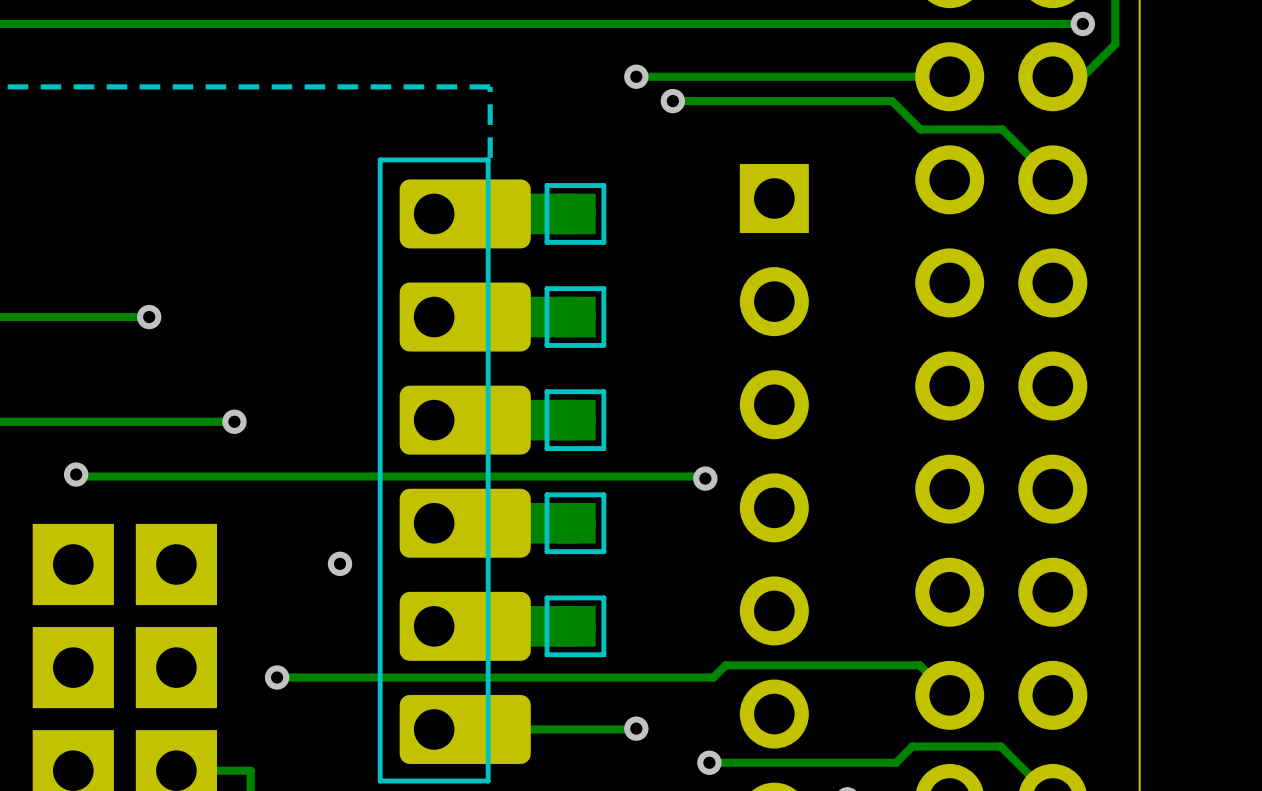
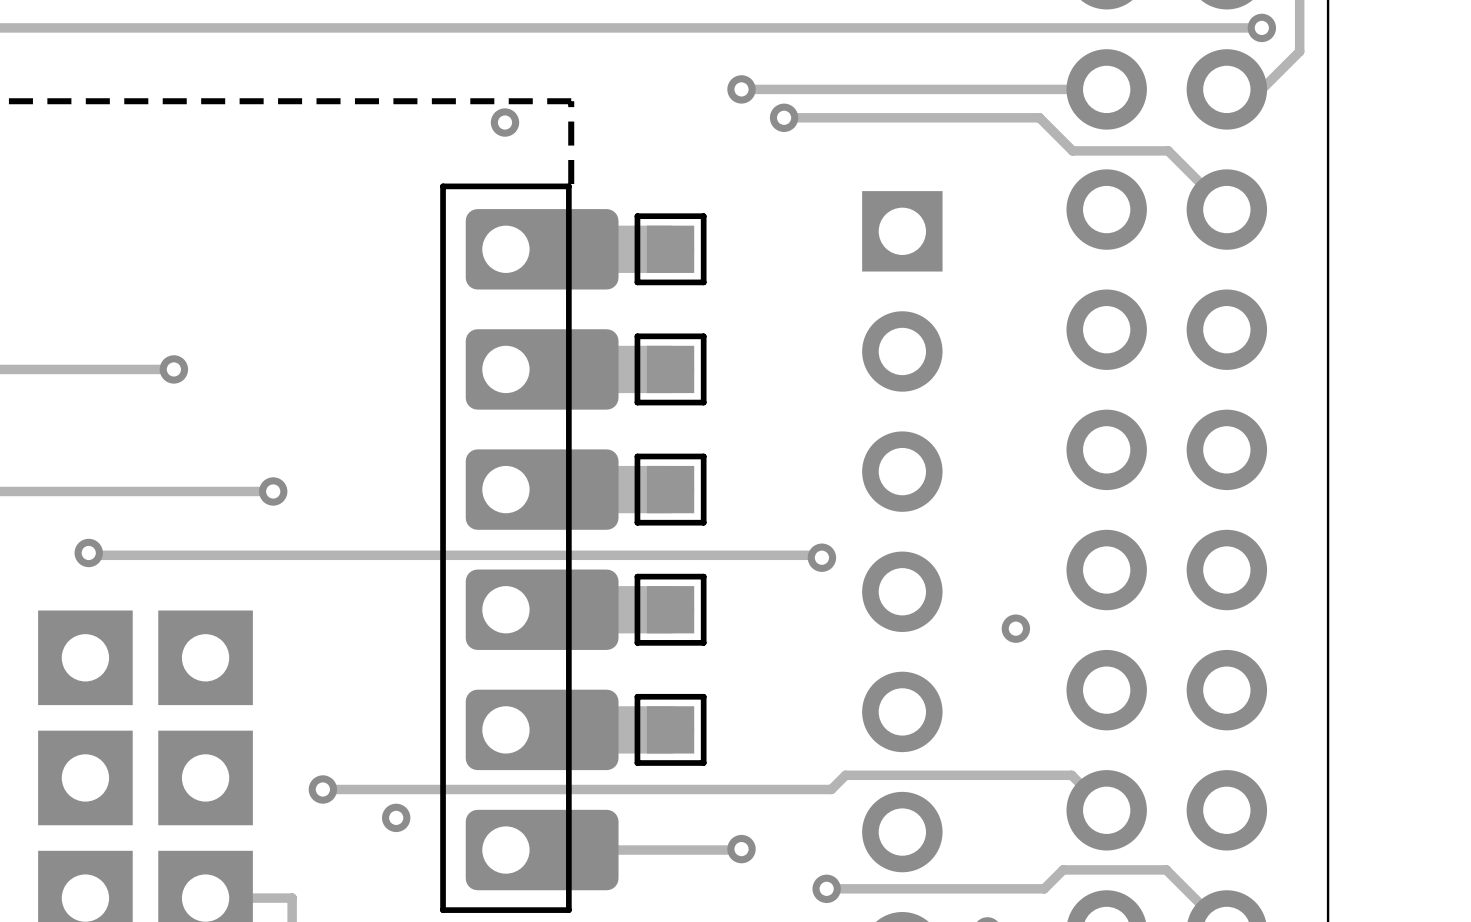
via: none -> (505, 122)
via: none -> (1015, 628)
via position: (340, 563) -> (396, 817)

